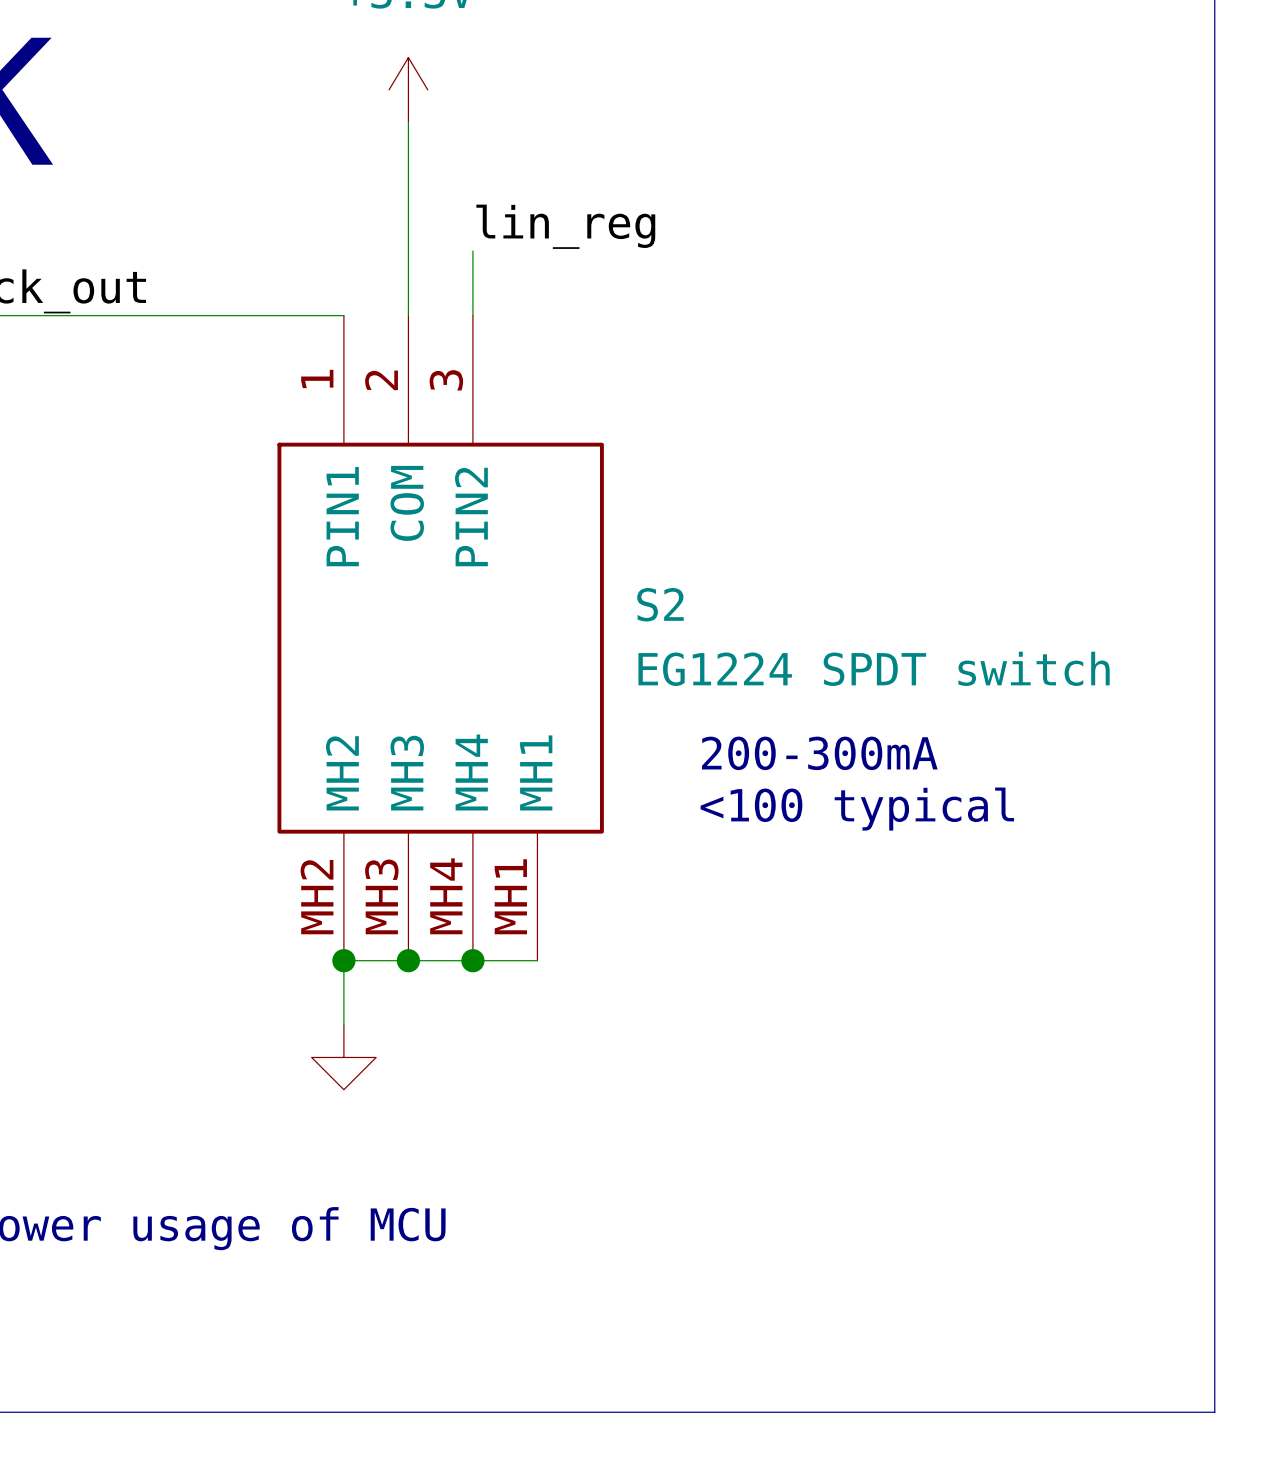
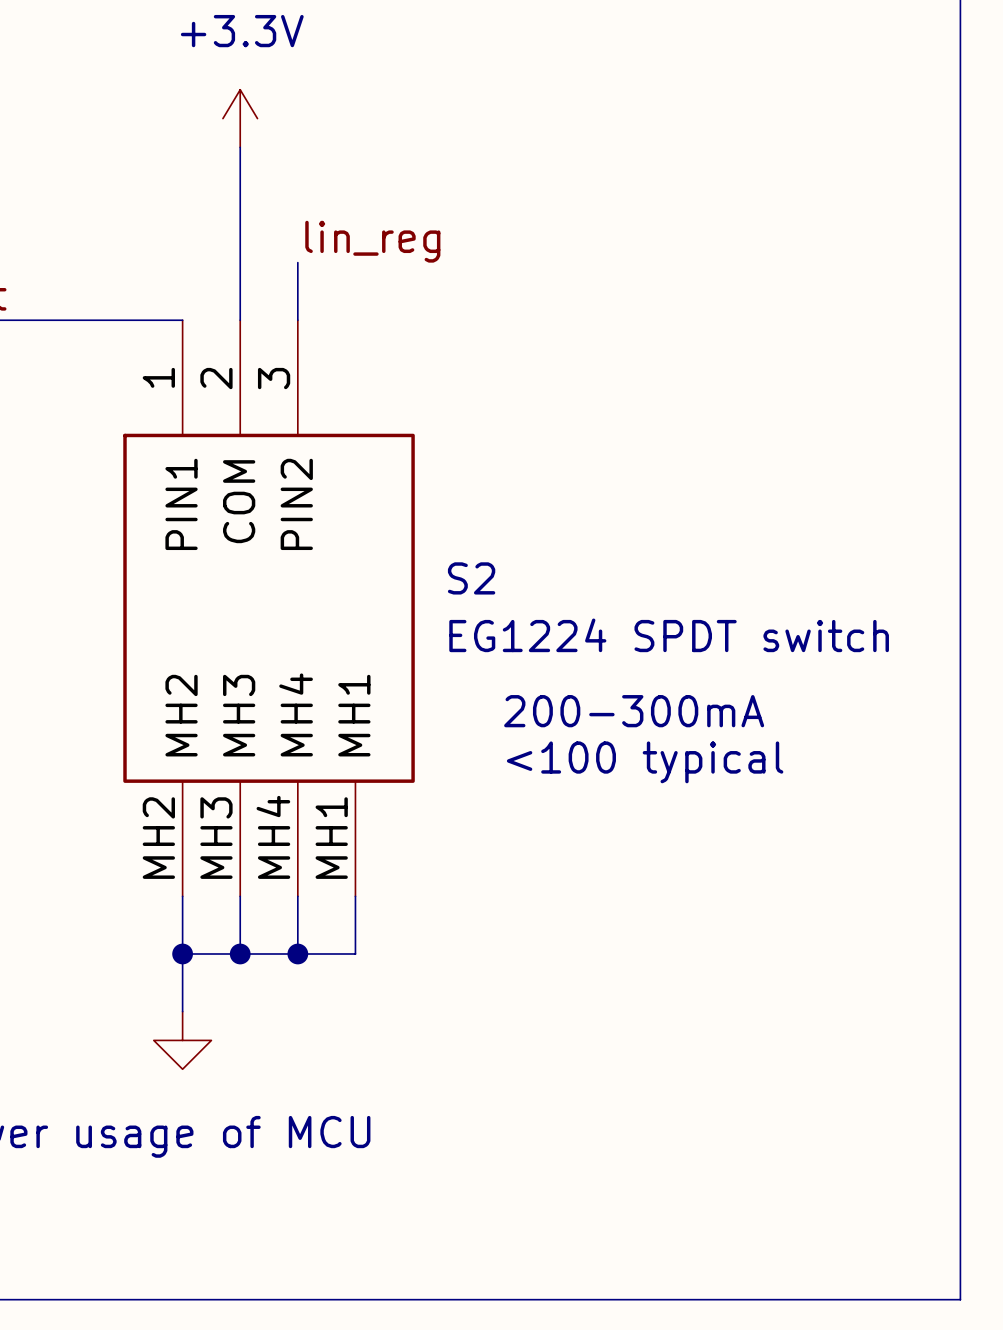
wire: (343, 960) (537, 960) -> (182, 1011) (182, 953) (355, 953) (355, 896)
junction: (343, 960) -> none
wire: none -> (240, 896) (240, 953)
junction: (408, 960) -> none
wire: none -> (297, 896) (297, 953)
junction: (472, 960) -> none
junction: none -> (182, 953)
junction: none -> (240, 953)
junction: none -> (297, 953)
power symbol position: (343, 1057) -> (182, 1040)

